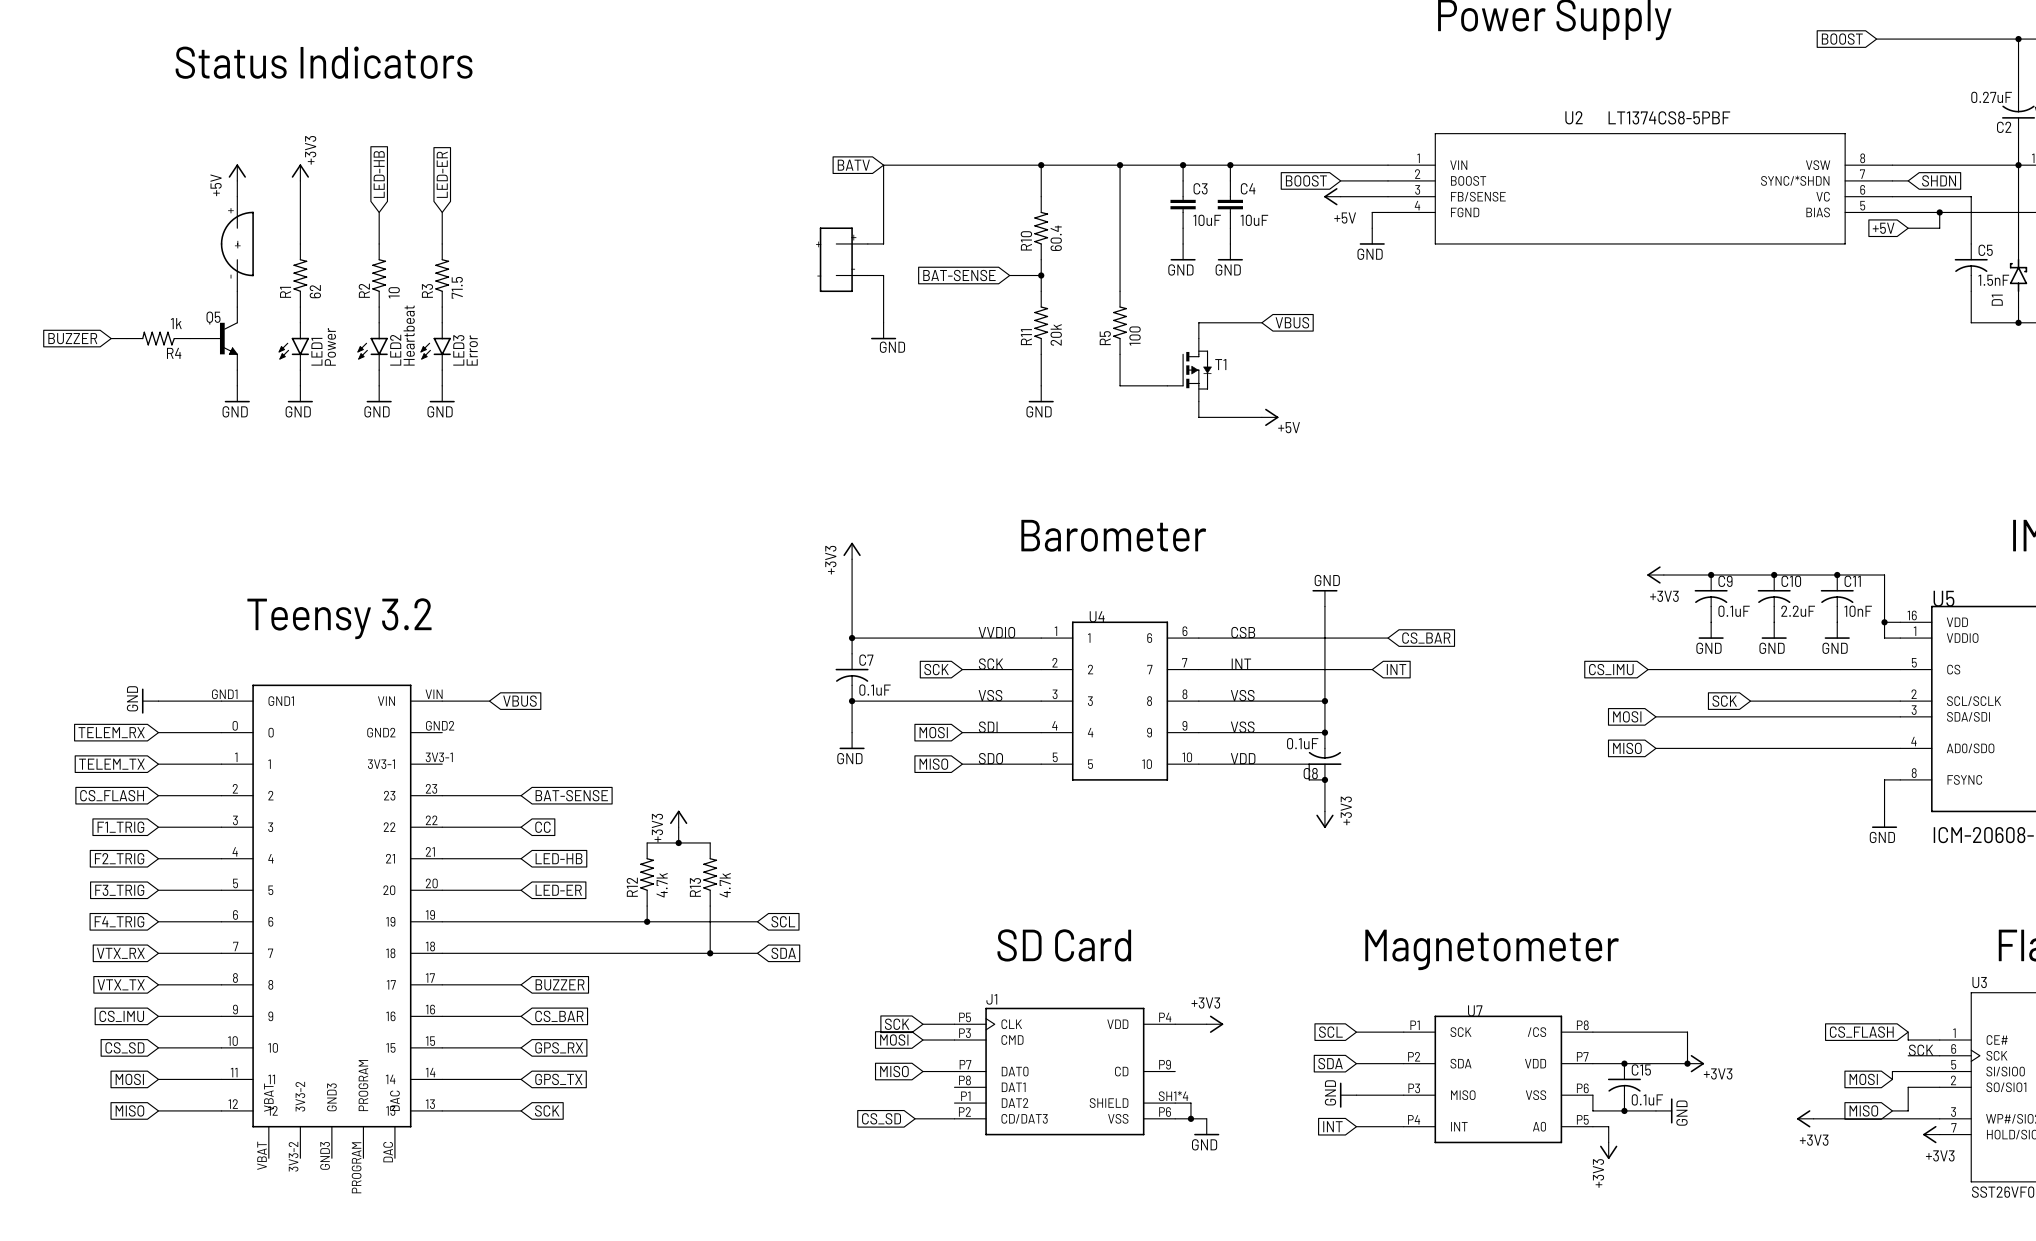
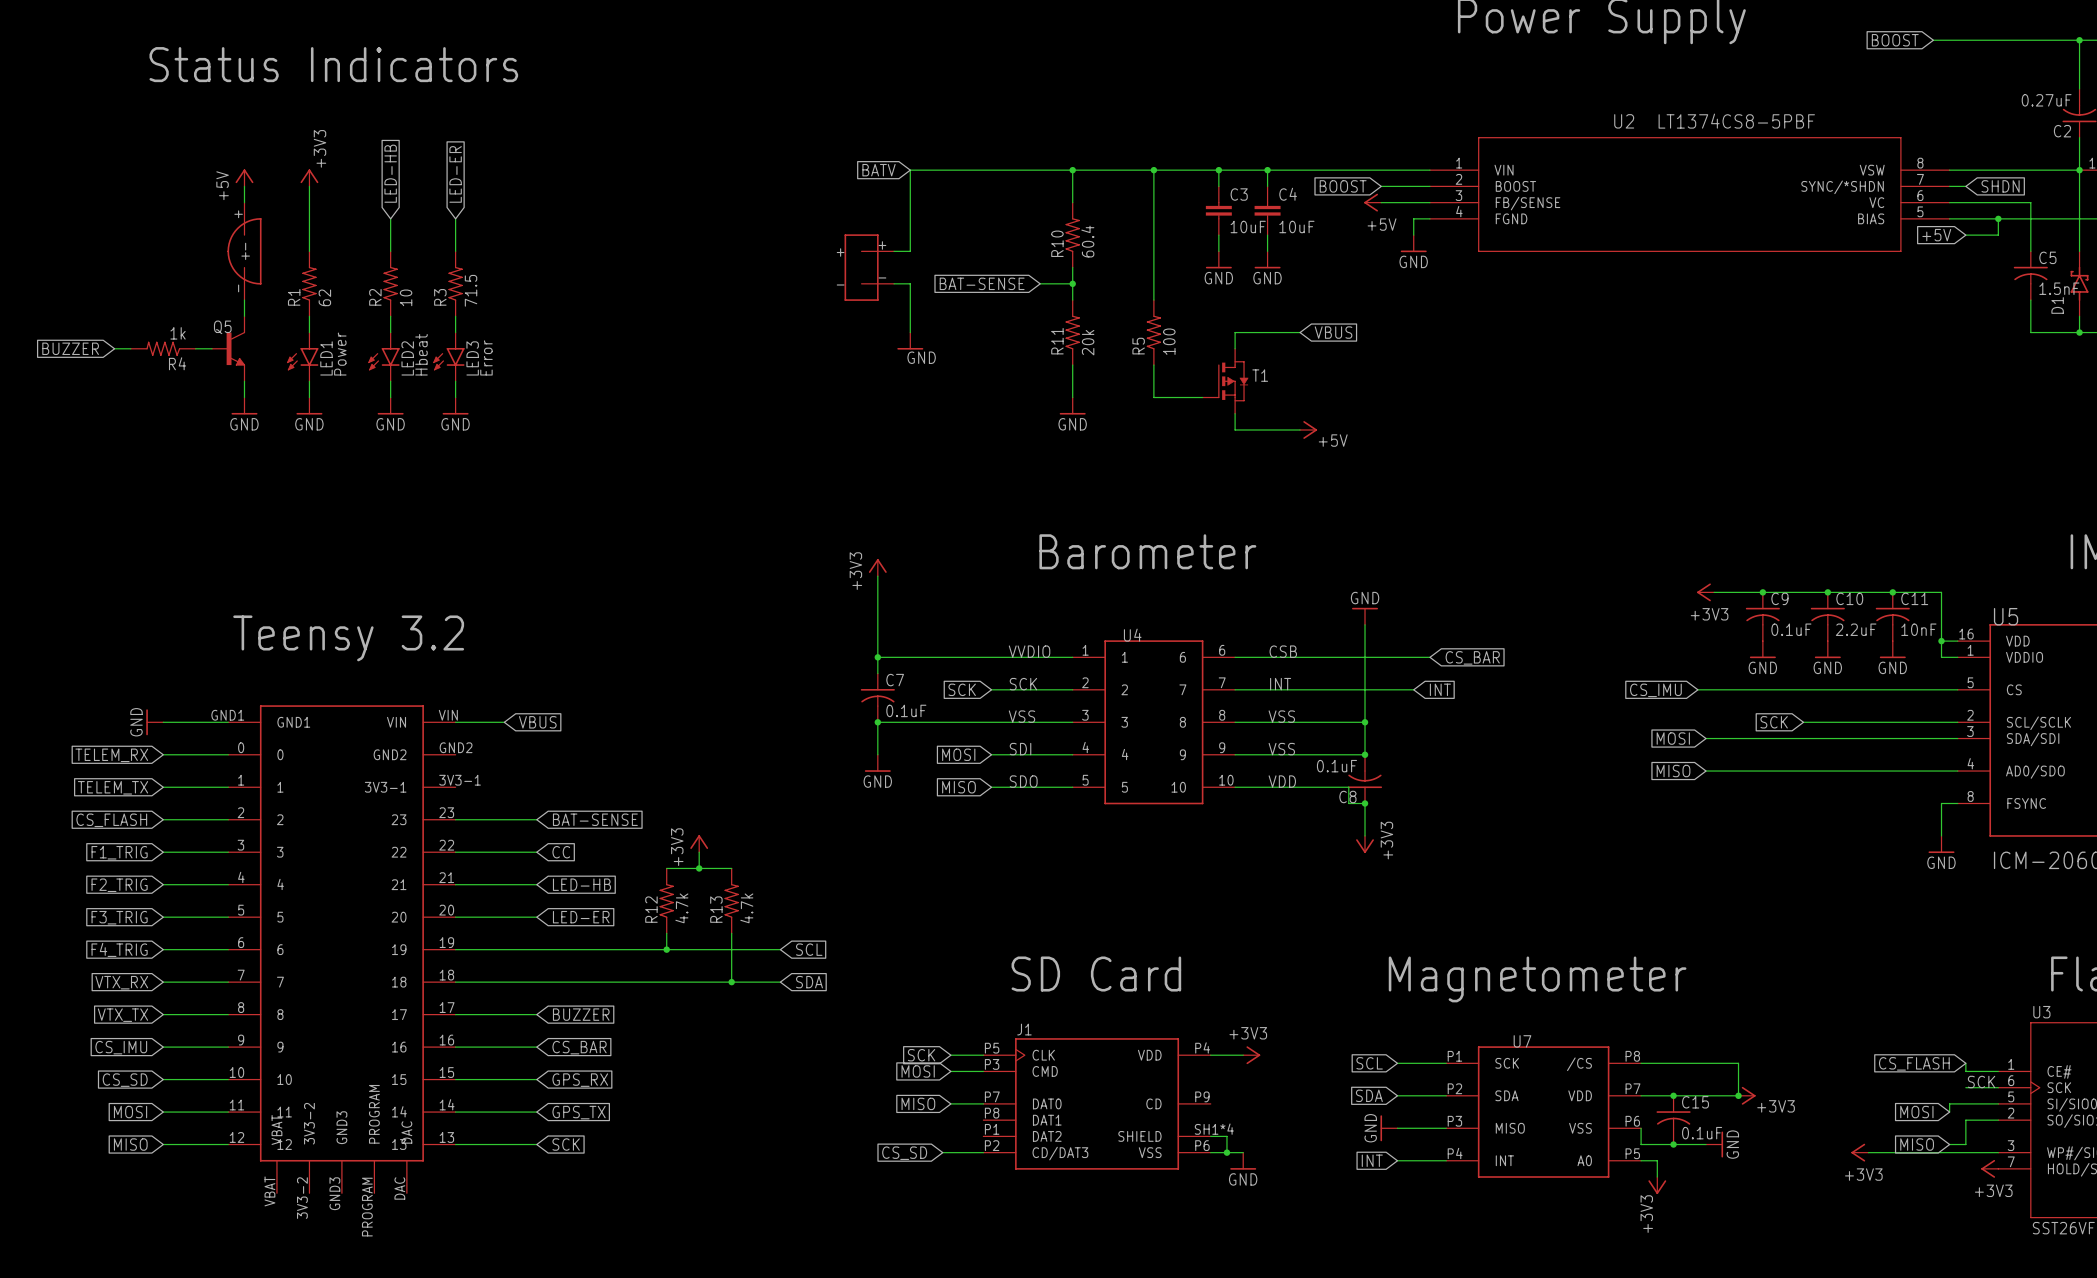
LED2 value: Heartbeat (409, 335) -> Hbeat (421, 354)

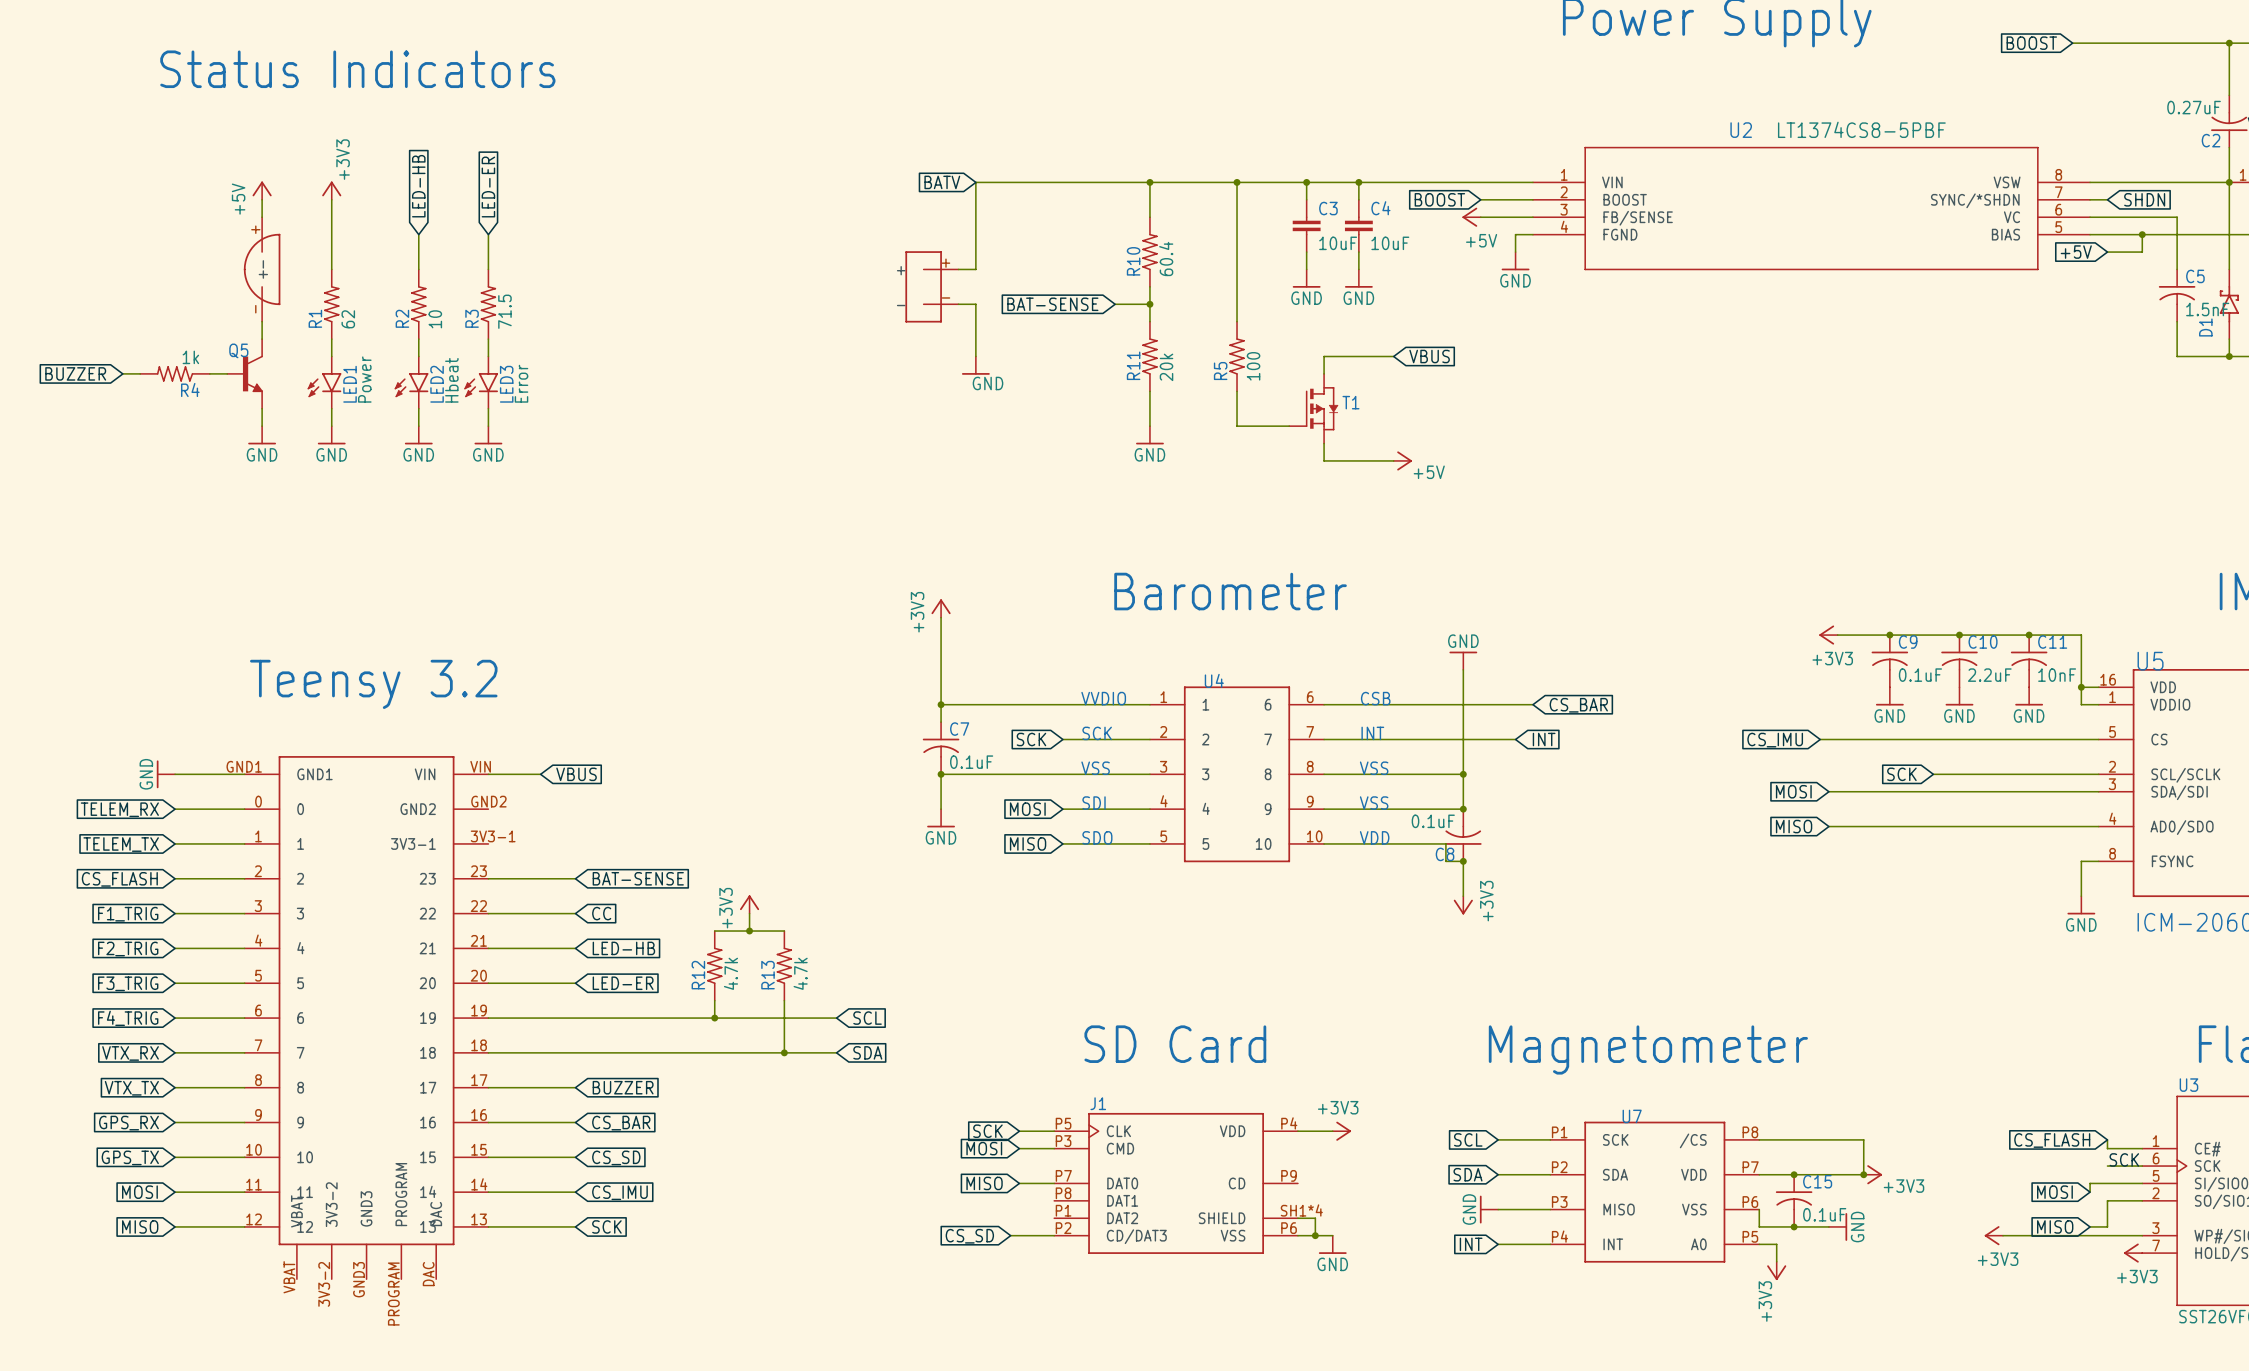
global label: CS_IMU (121, 1047) -> GPS_RX (128, 1123)
global label: CS_SD (125, 1080) -> GPS_TX (130, 1157)
global label: GPS_RX (580, 1080) -> CS_SD (616, 1157)
global label: GPS_TX (579, 1112) -> CS_IMU (619, 1192)

